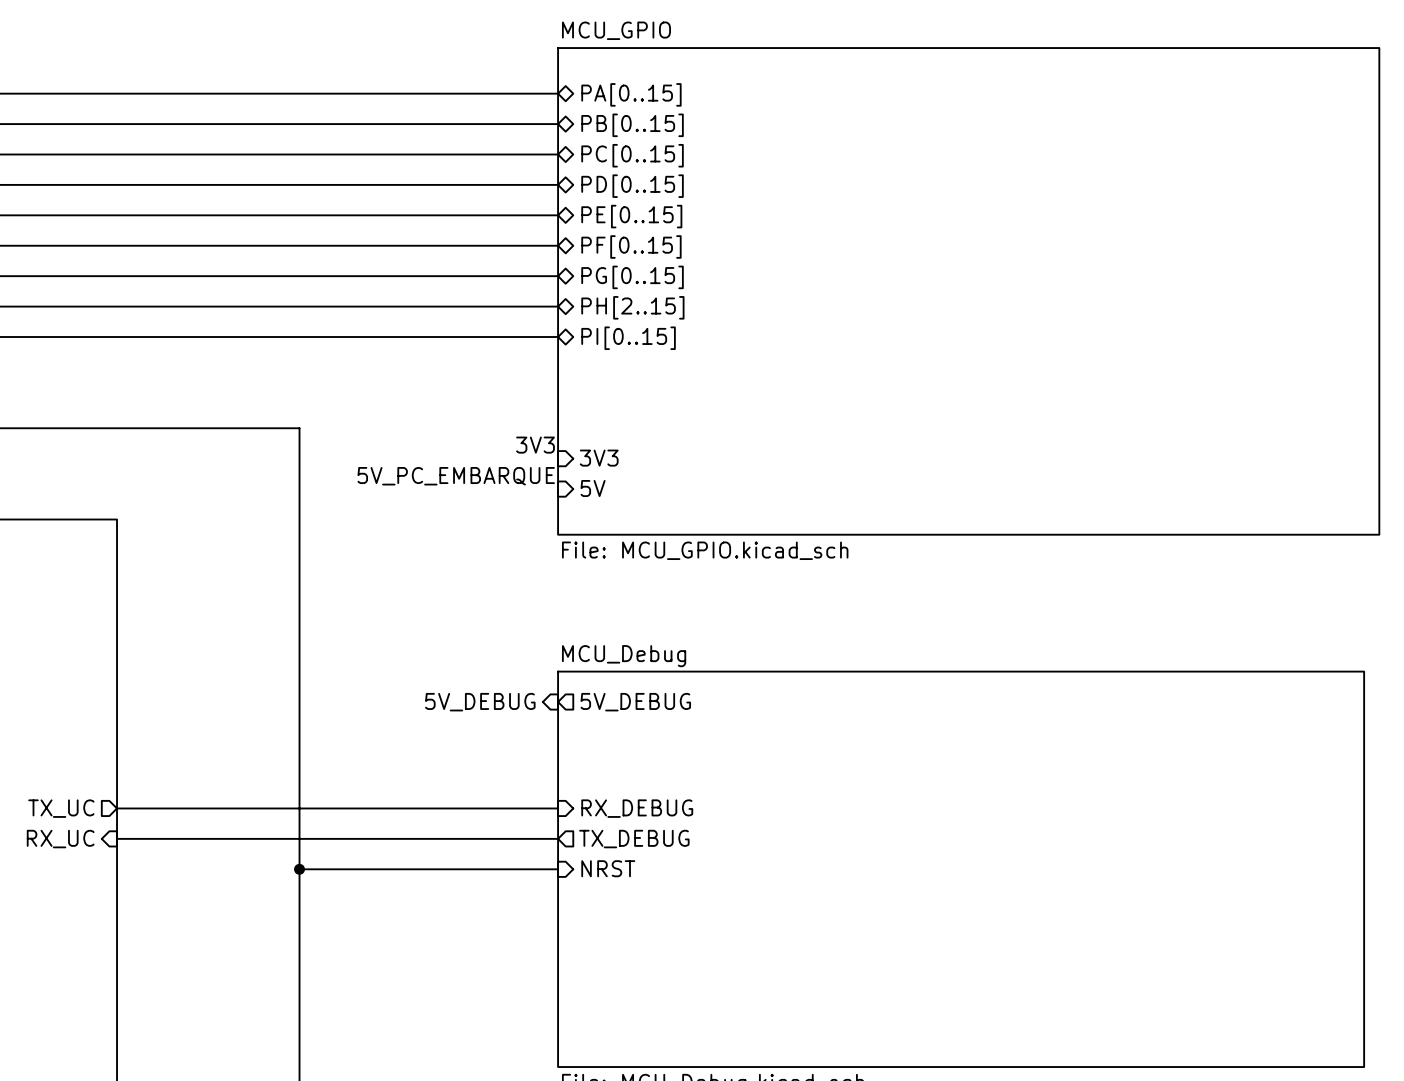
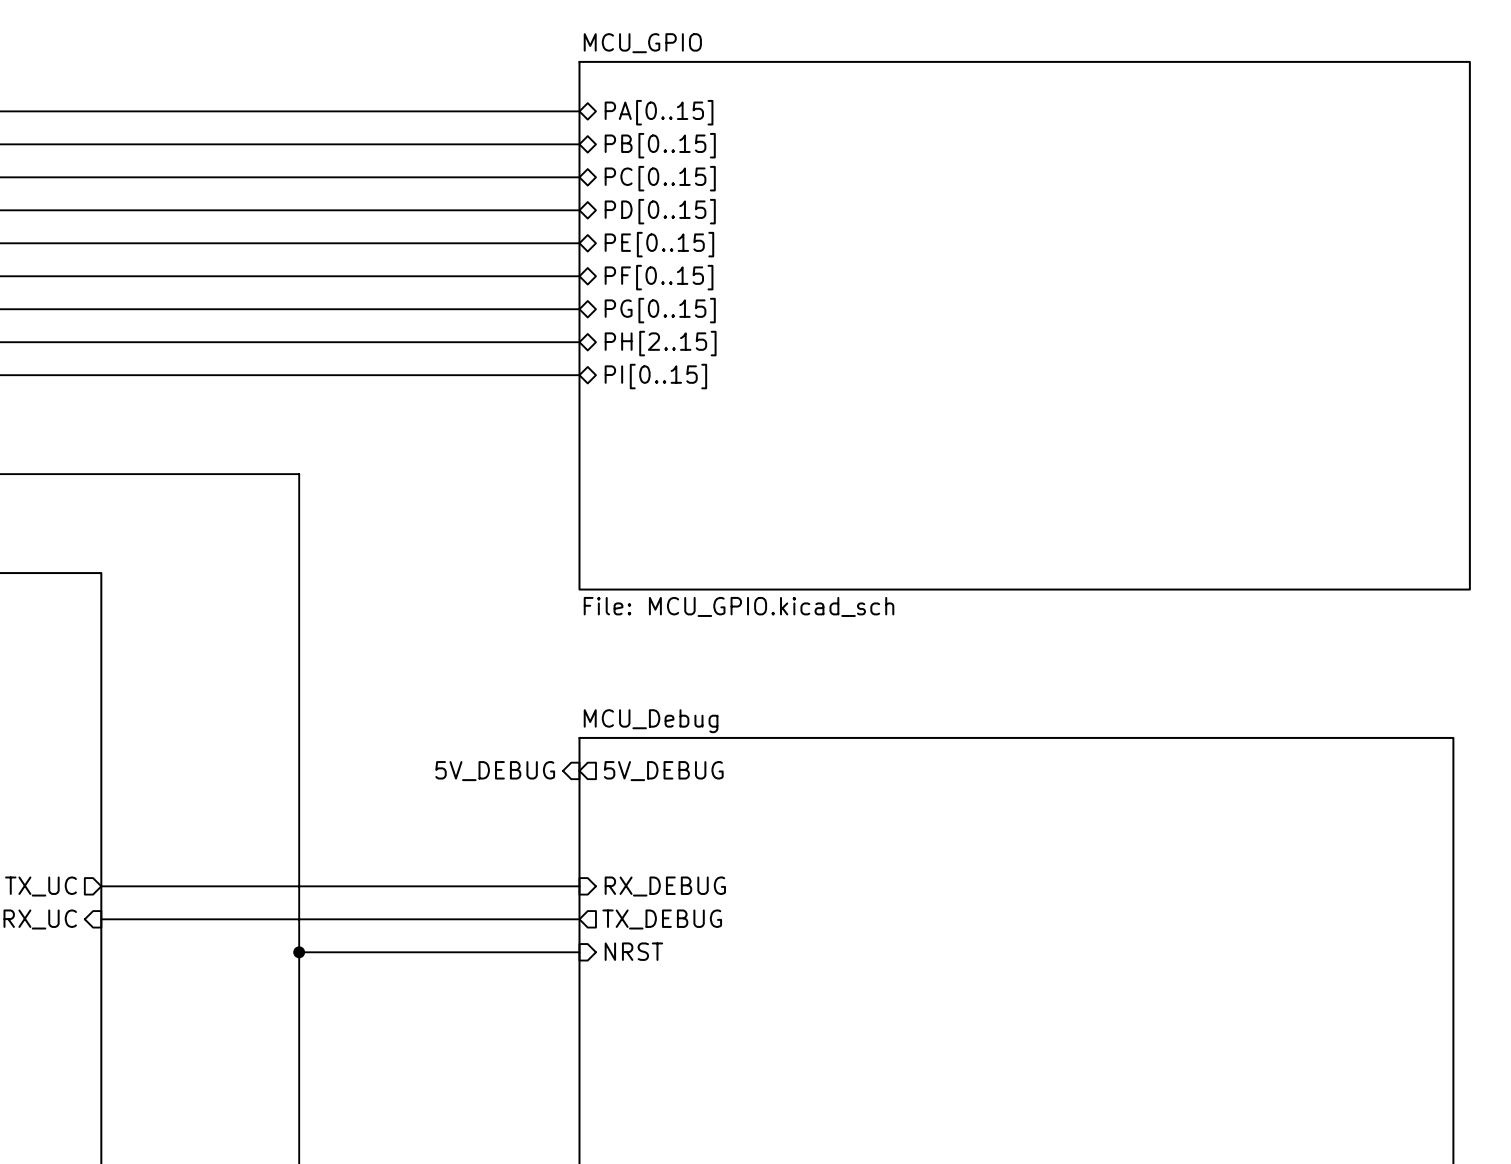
label: 3V3 (535, 445) -> none
sheet pin: 3V3 (599, 458) -> none
label: 5V_PC_EMBARQUE (456, 476) -> none
sheet pin: 5V (593, 488) -> none

